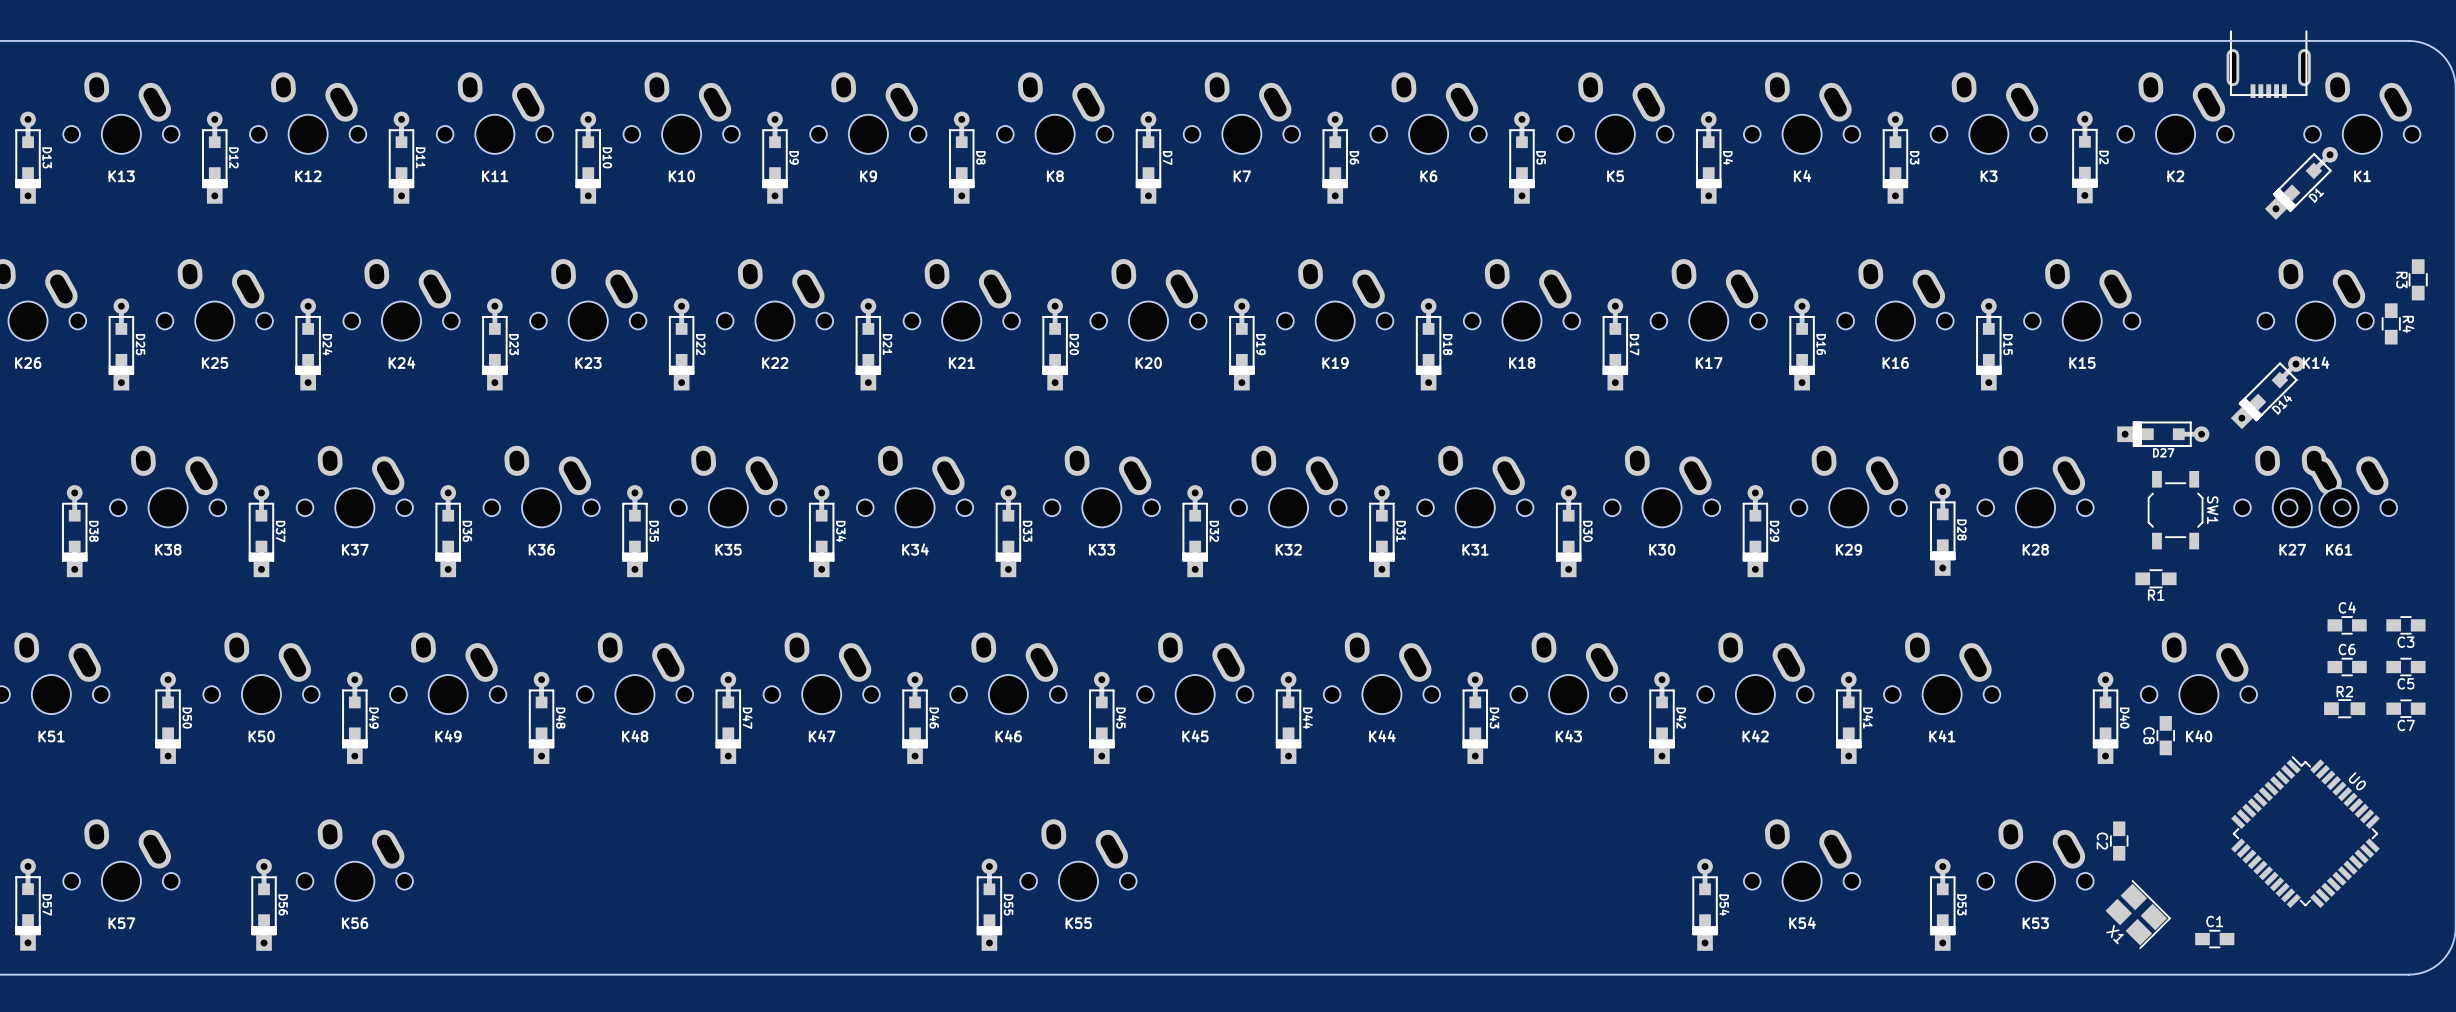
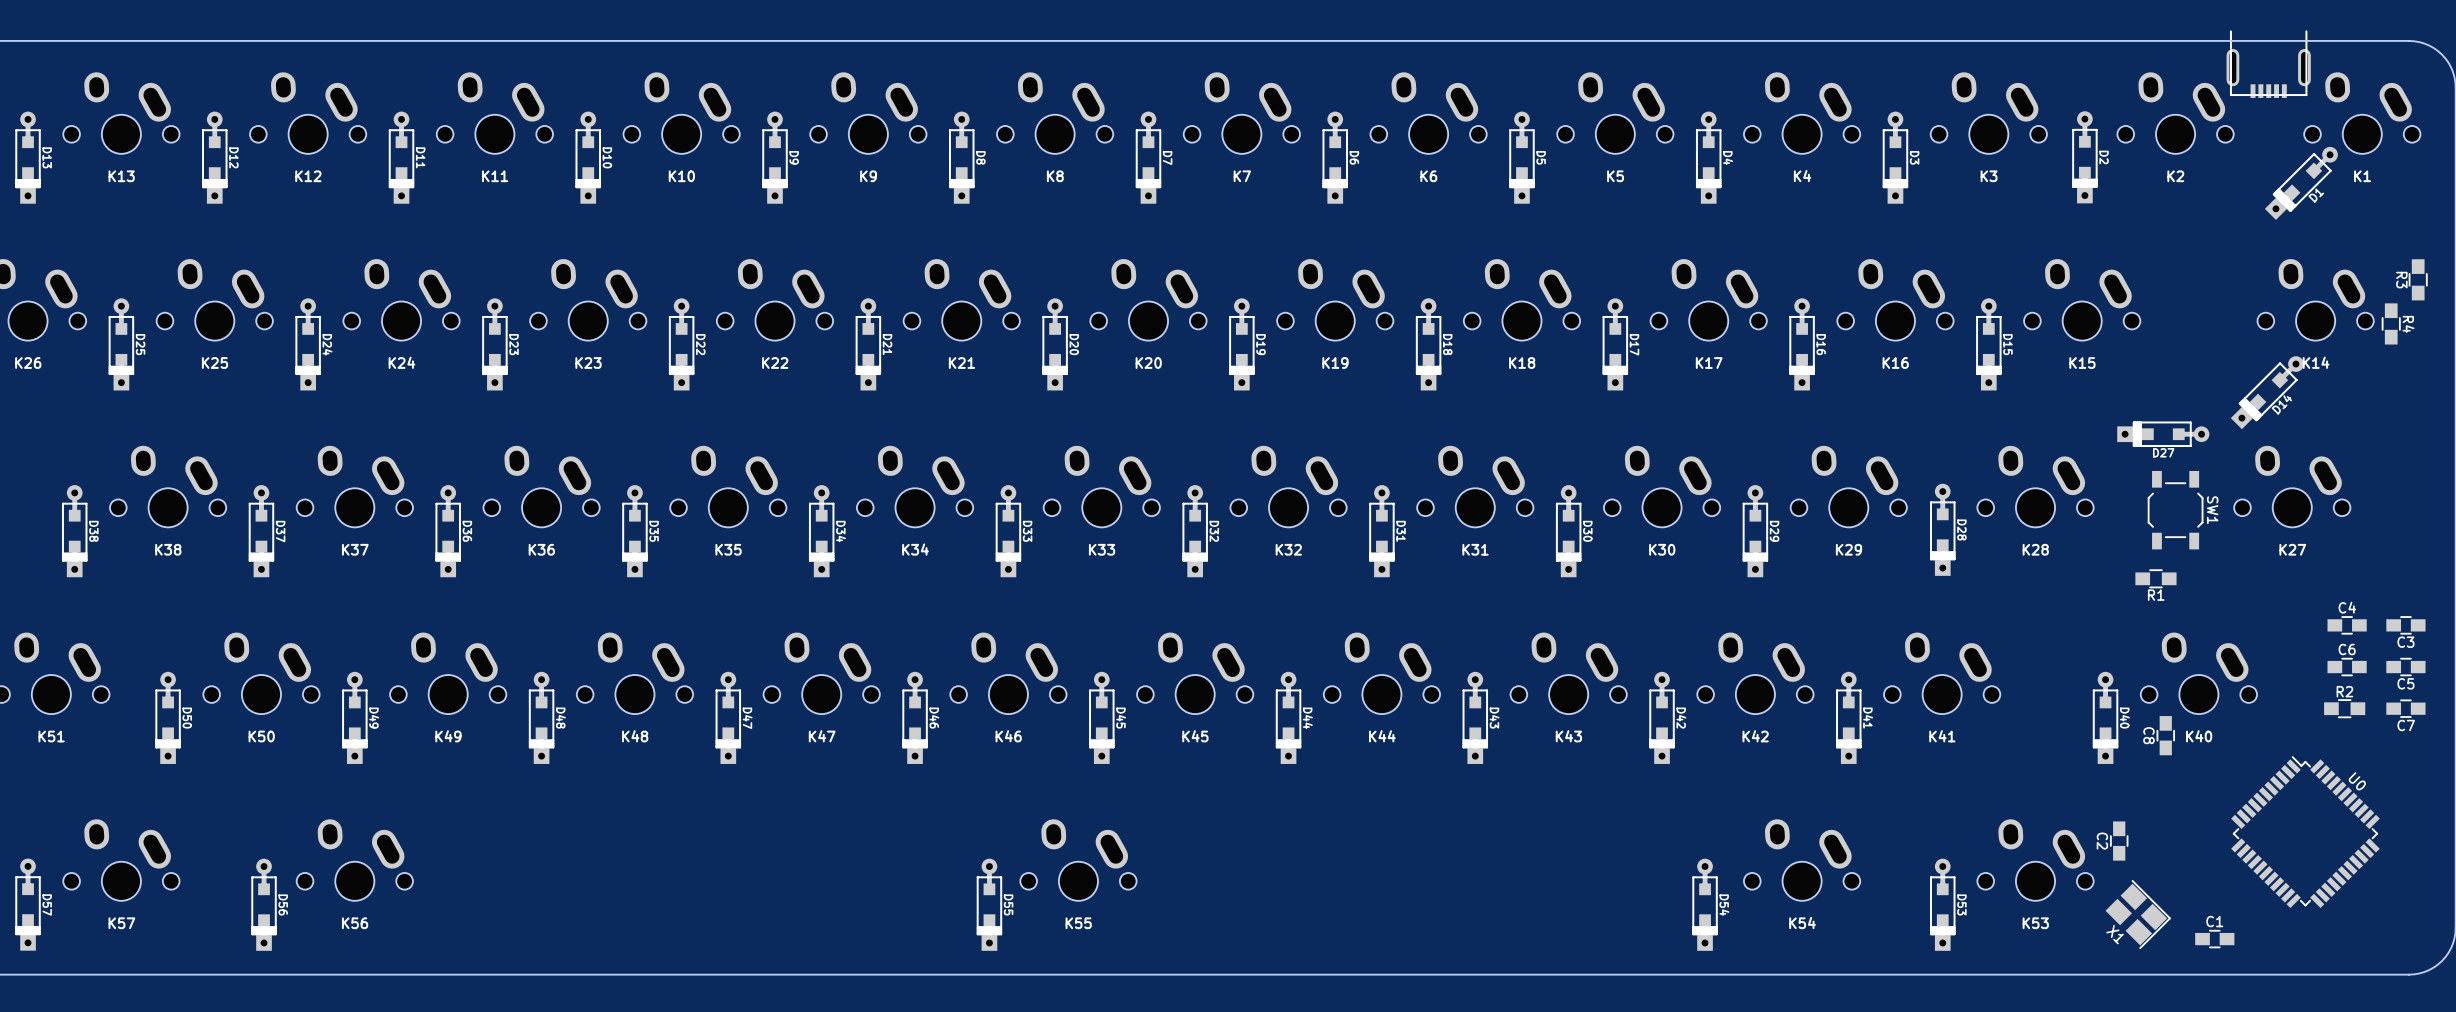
K61: (2338, 486) -> none

